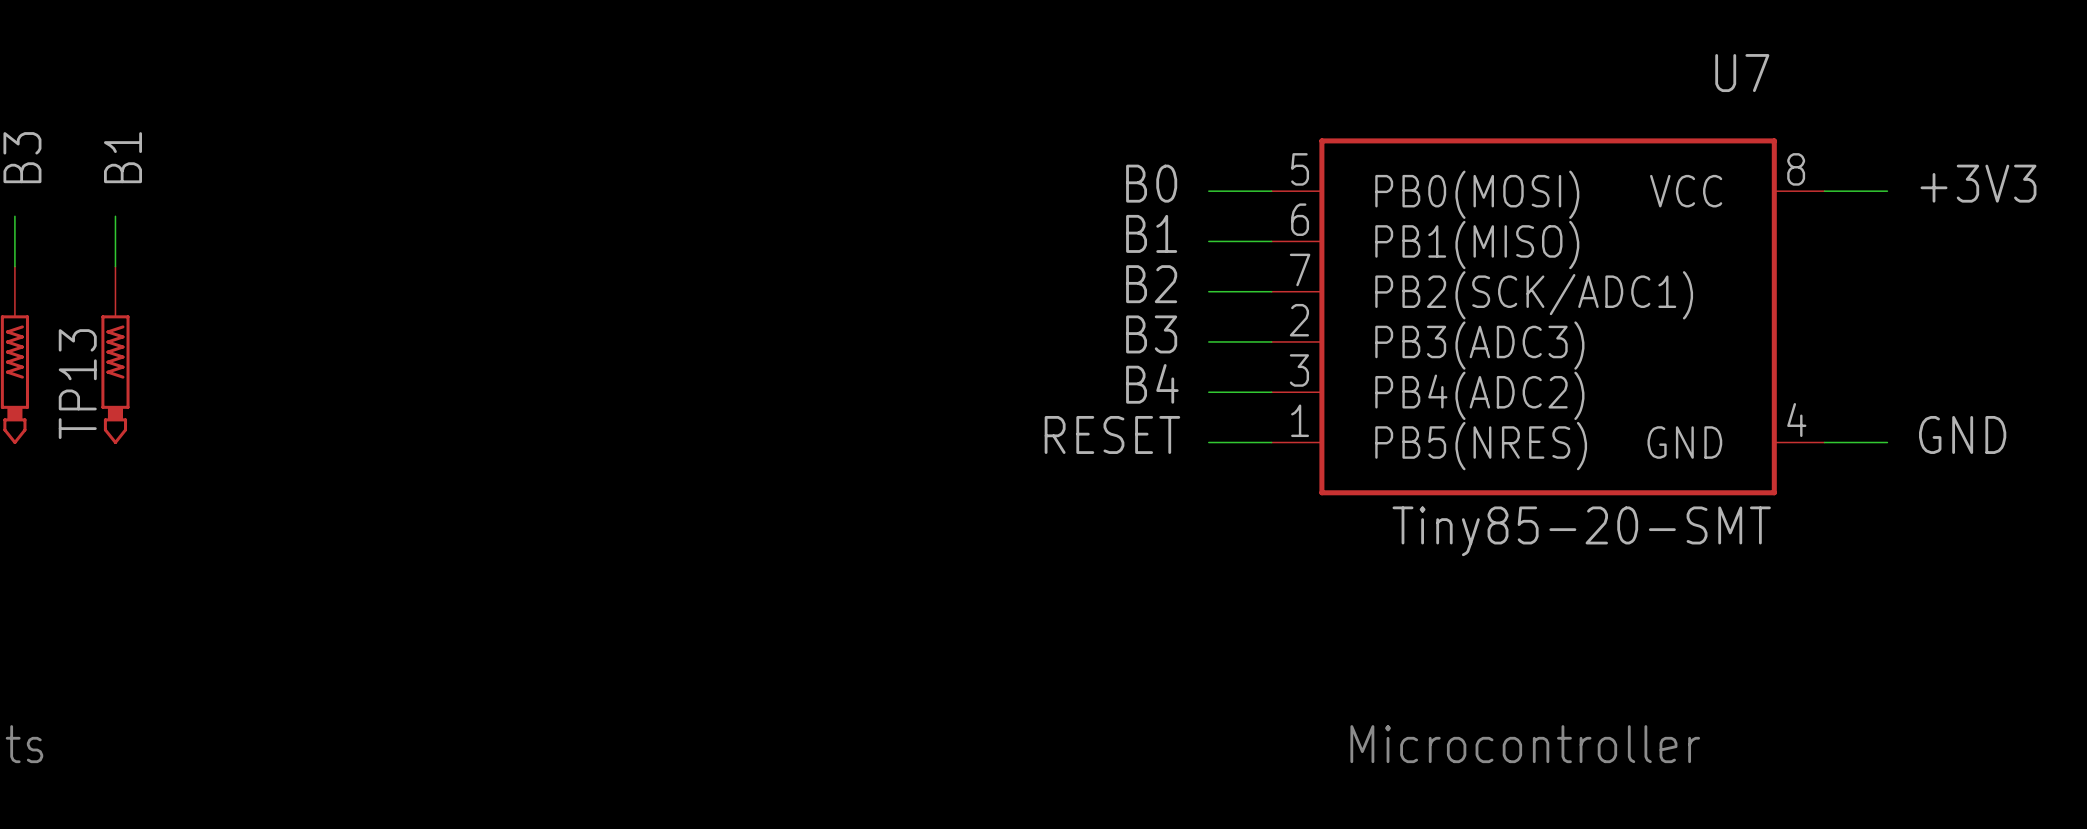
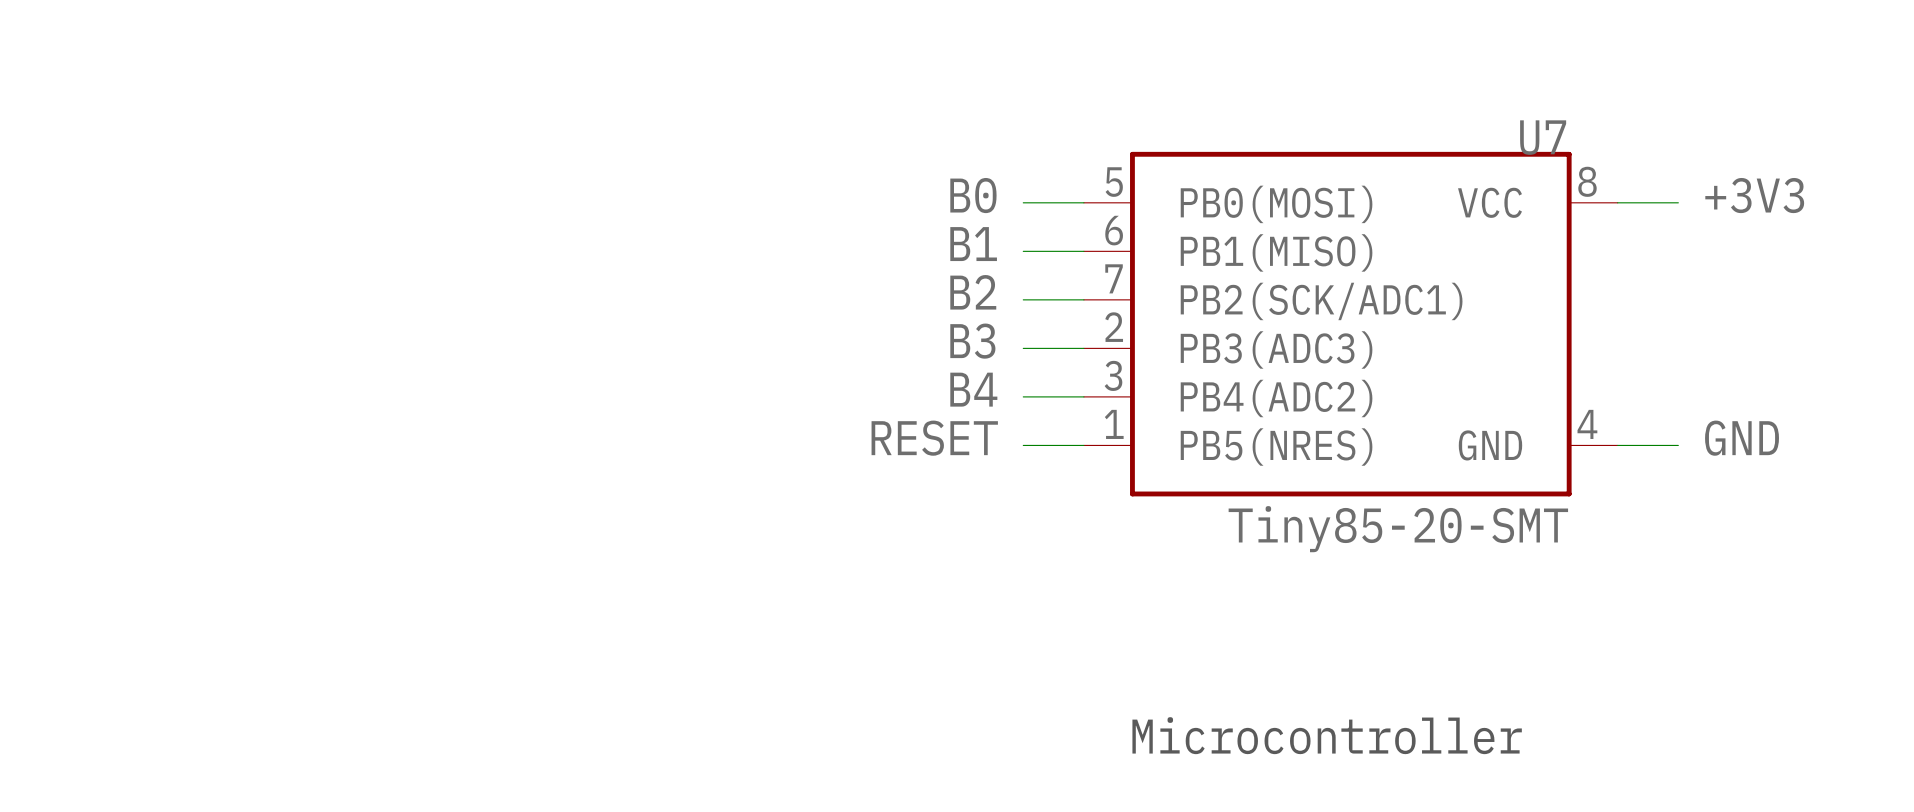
U7 name position: U7 (1742, 73) -> U7 (1543, 137)

